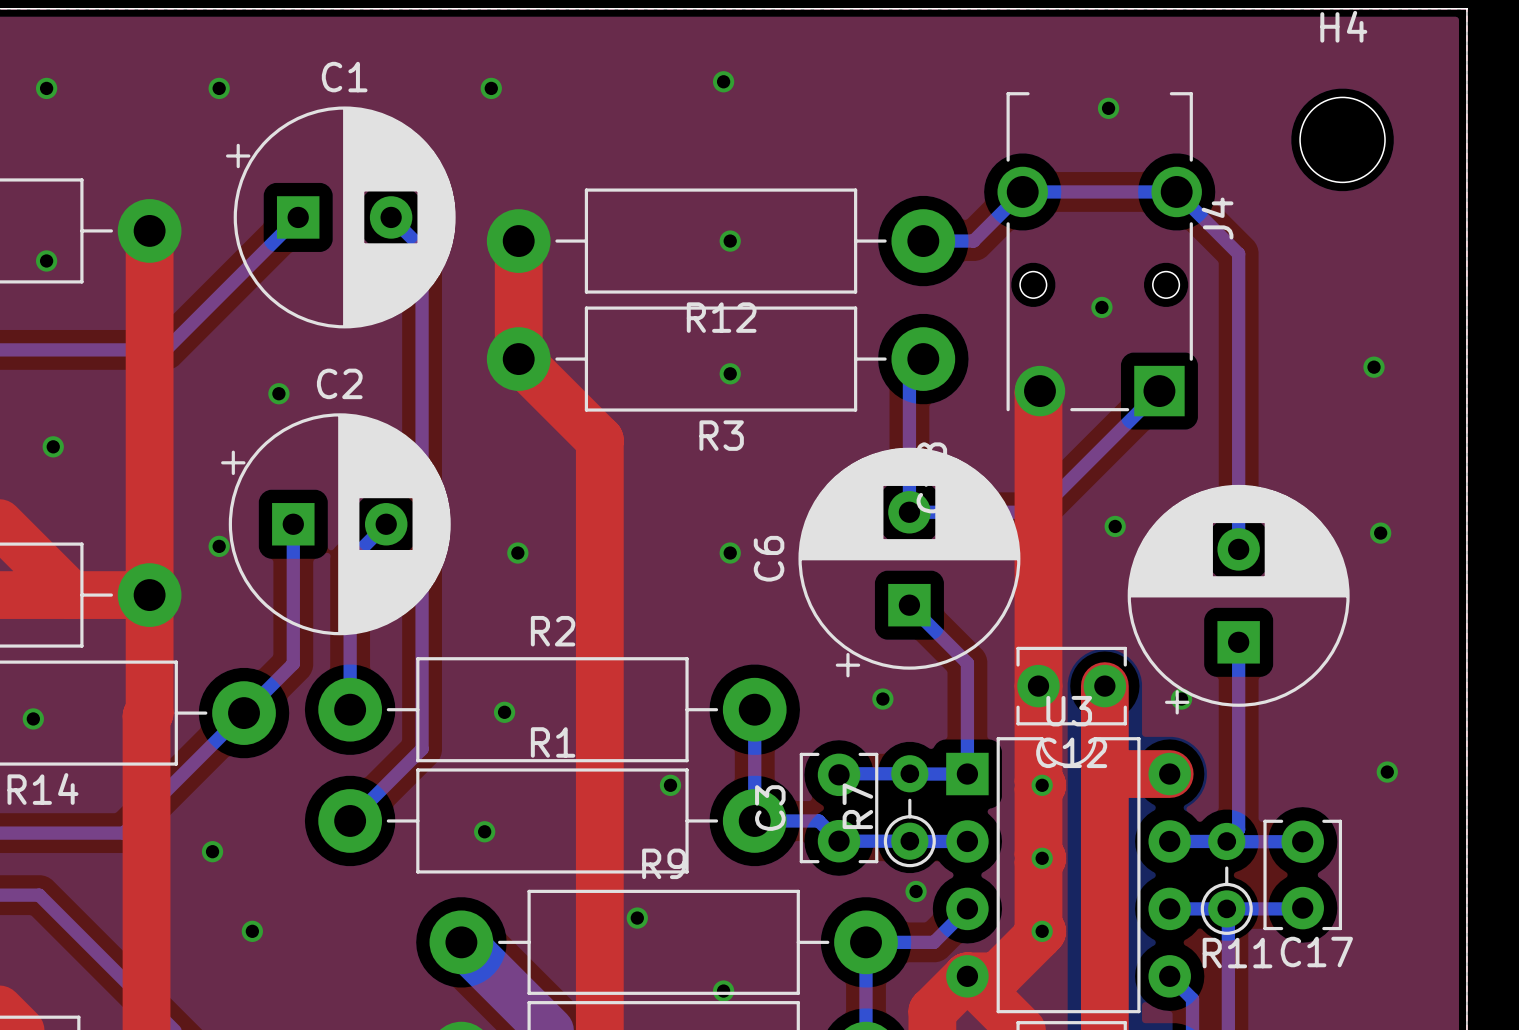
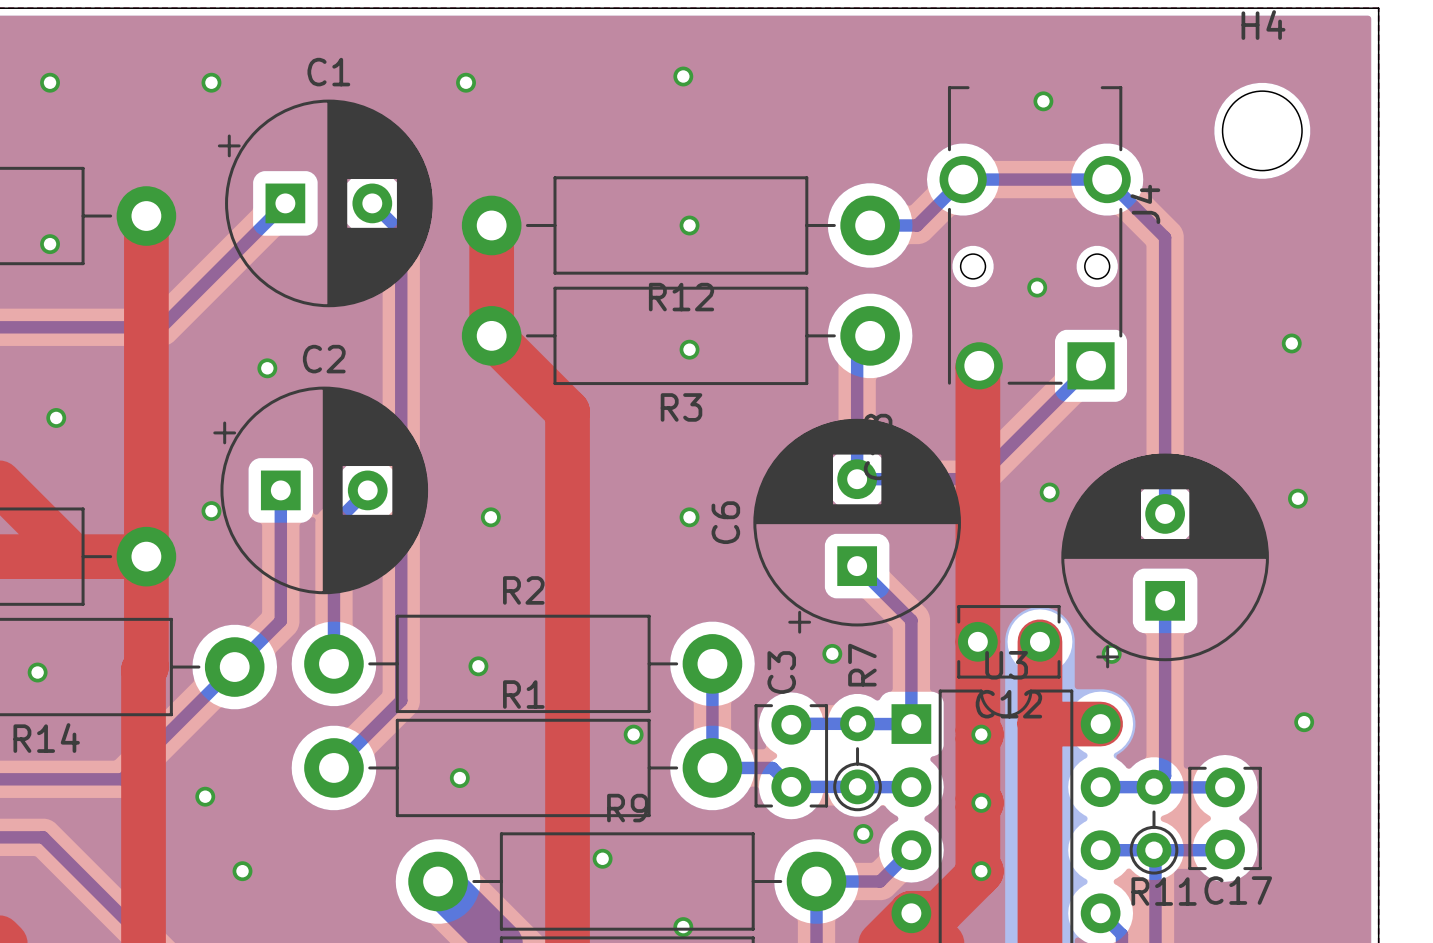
R7 name position: R7 (857, 806) -> R7 (862, 665)
C3 name position: C3 (770, 808) -> C3 (781, 672)

